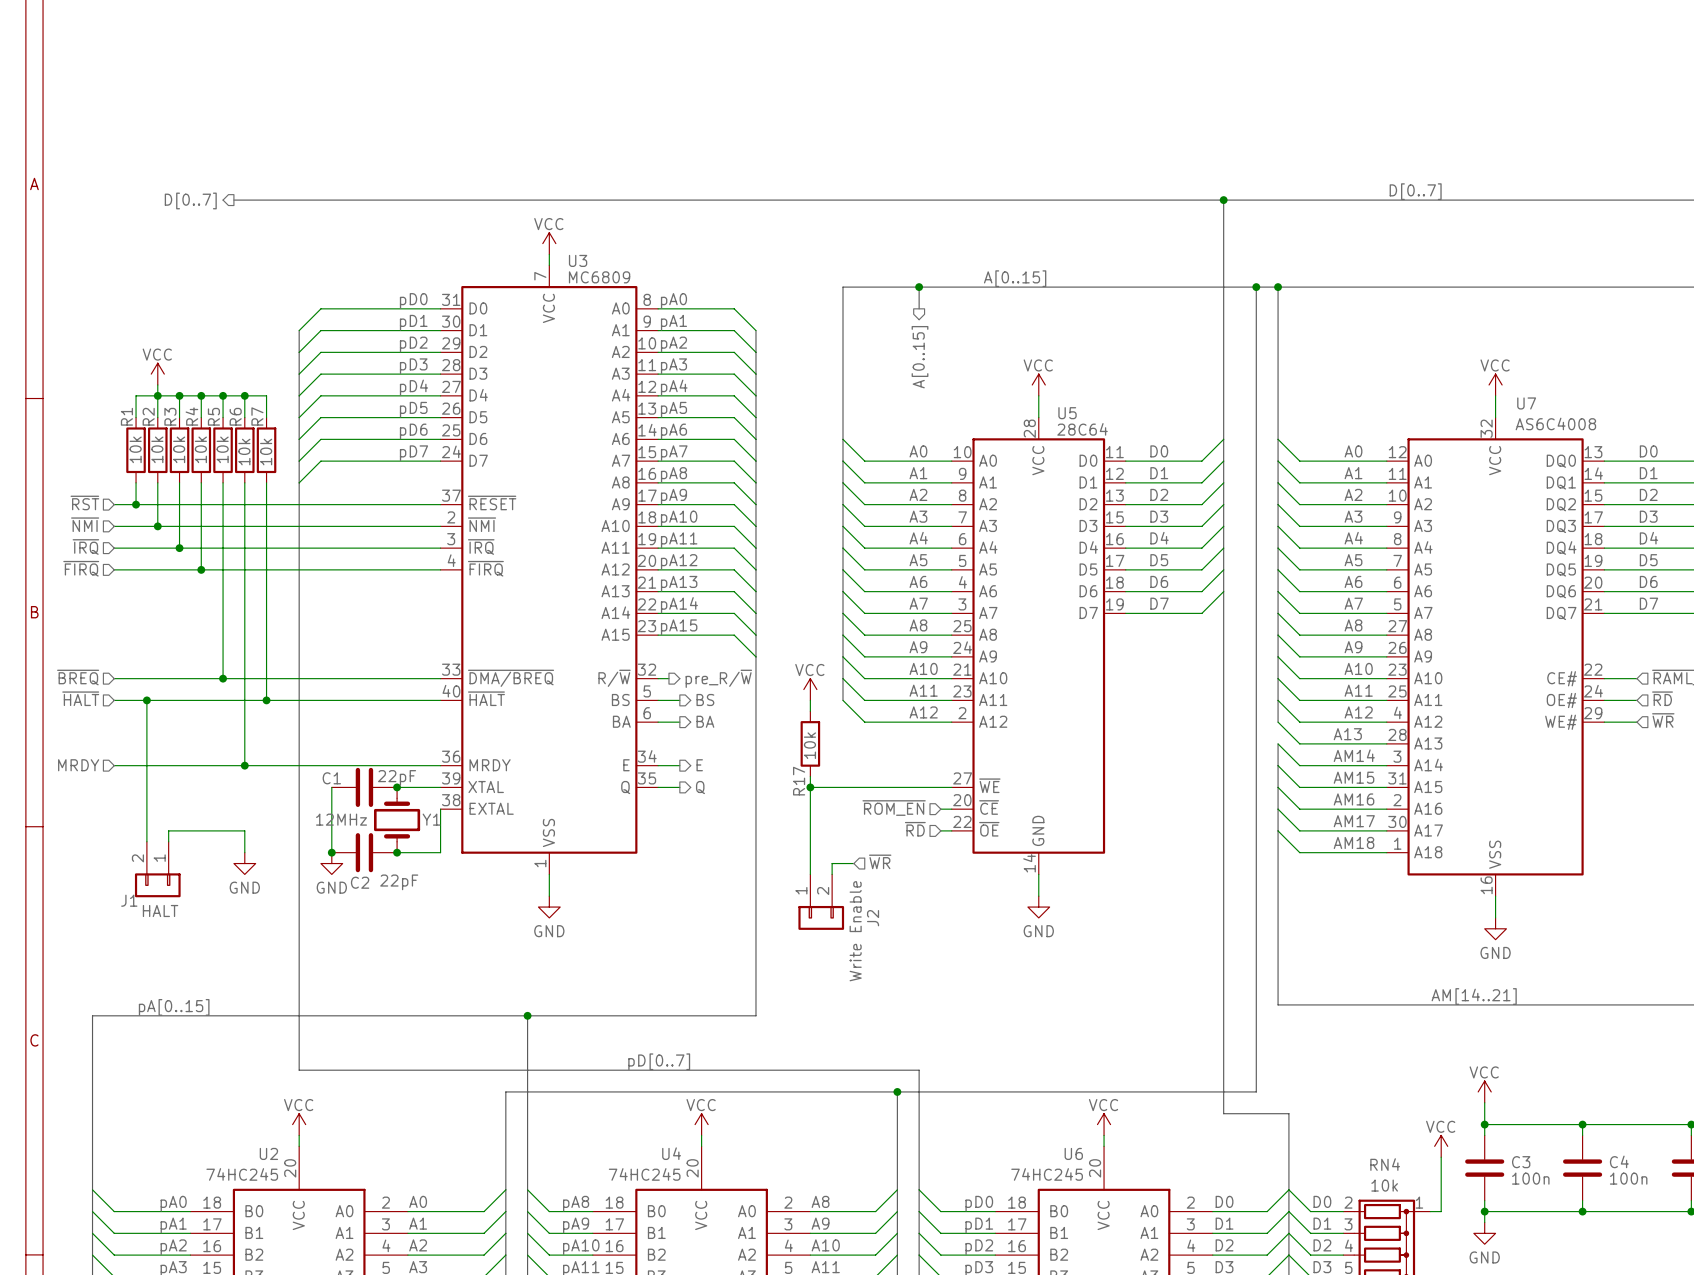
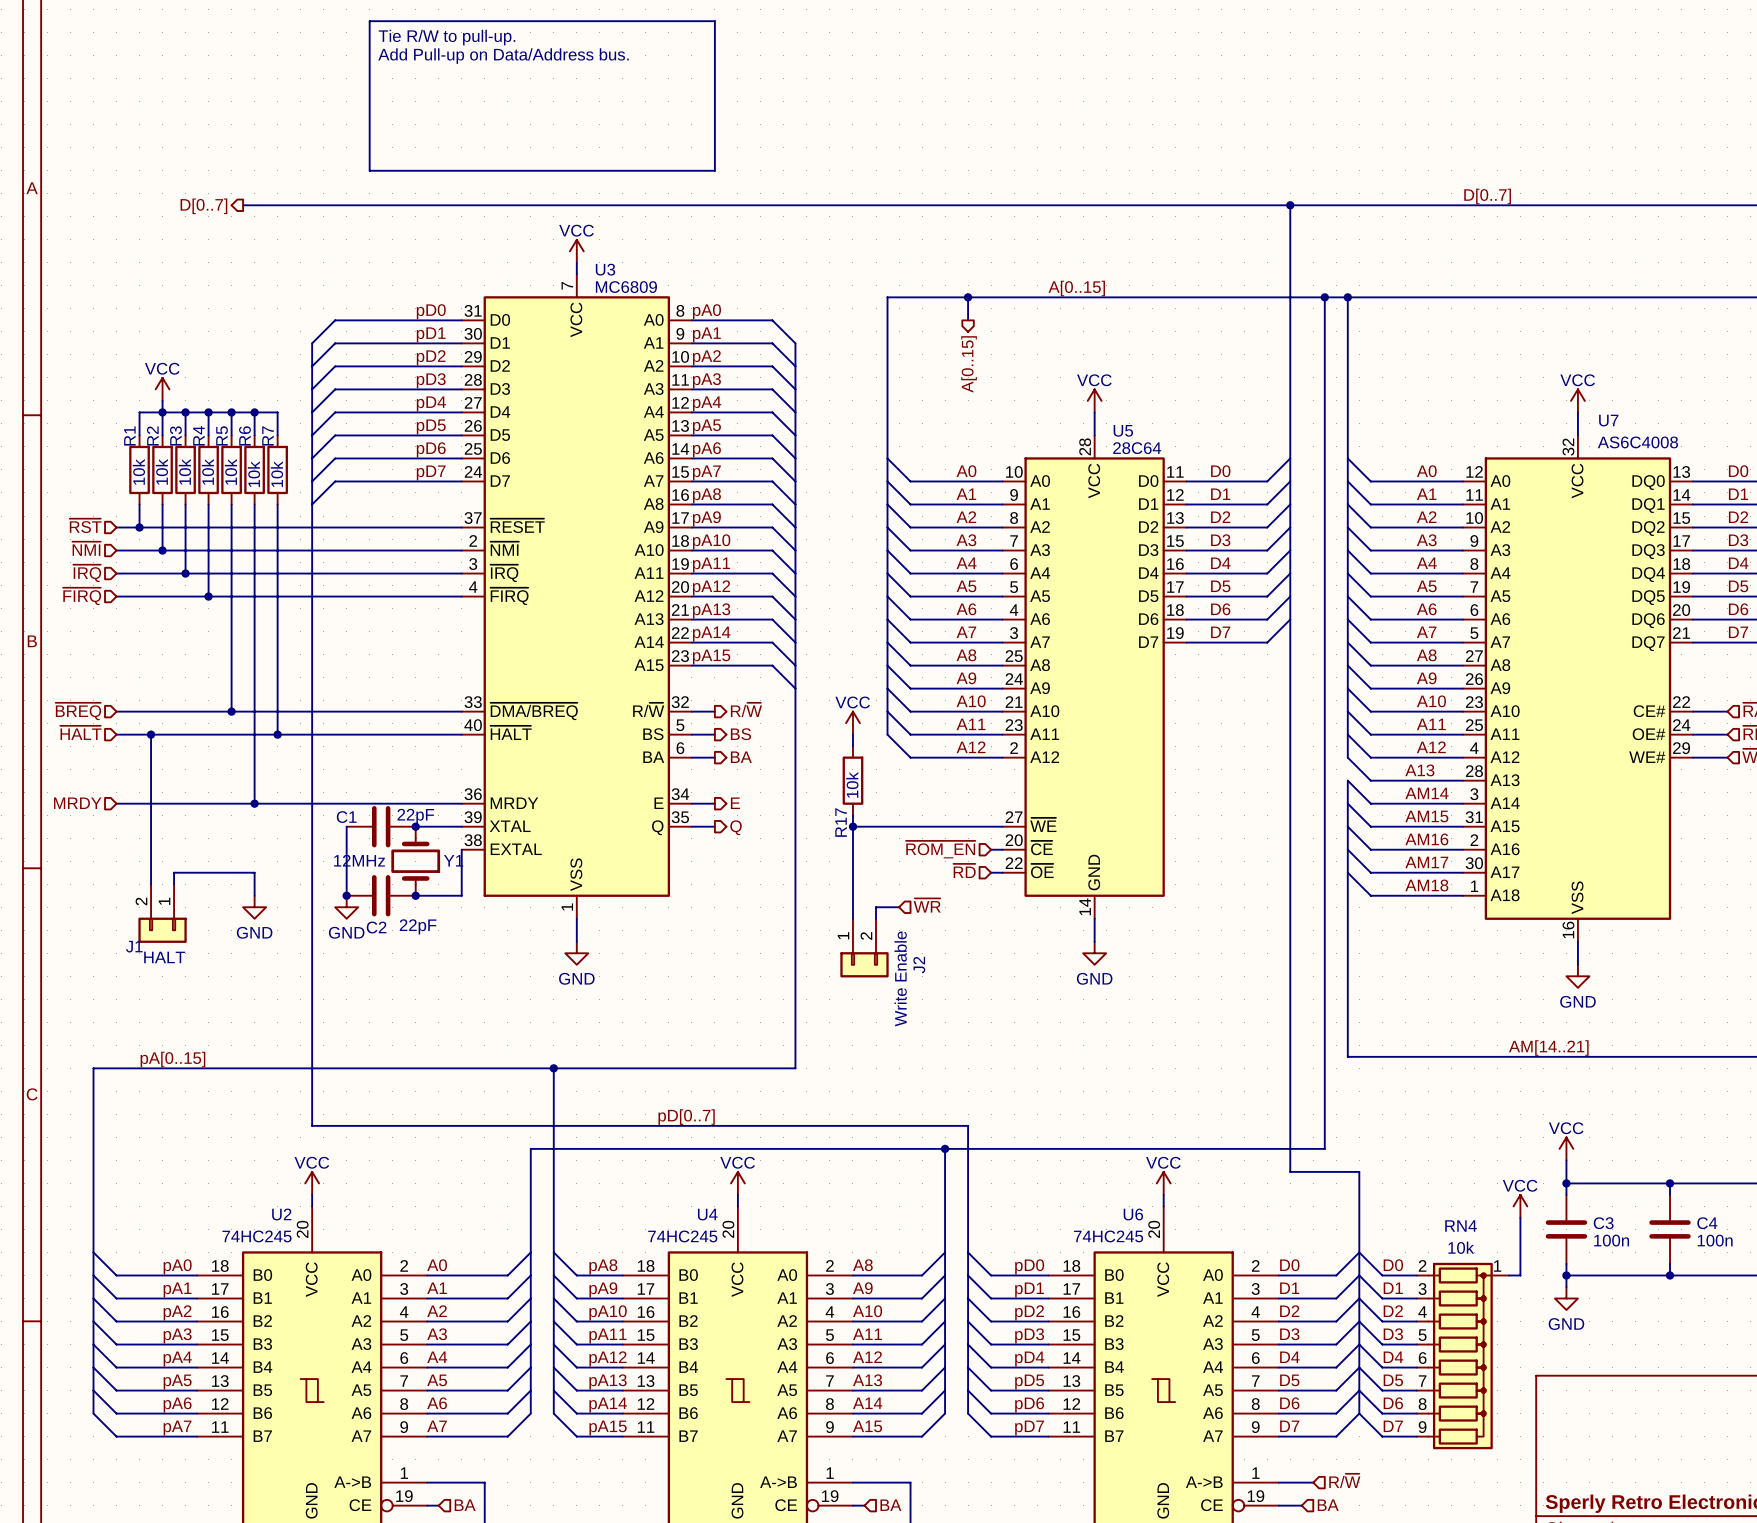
line: none -> (369, 21) (714, 21) (714, 170) (369, 170) (369, 21)
text: none -> Tie R/W to pull-up. (446, 37)
text: none -> Add Pull-up on Data/Address bus. (503, 56)
wire: none -> (703, 711) (714, 711)
hierarchical label: pre_R/~{W} (718, 678) -> R/~{W} (746, 709)

